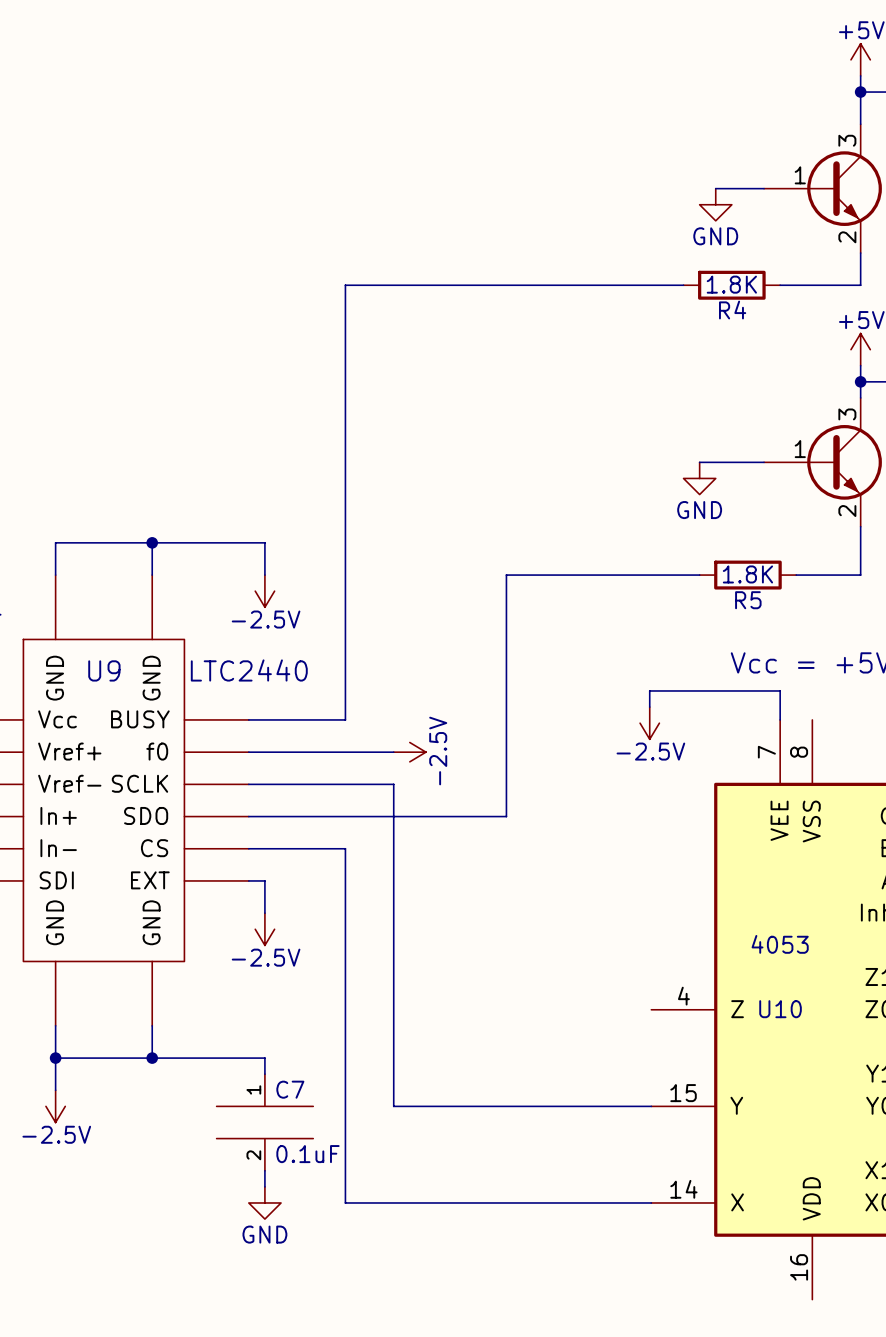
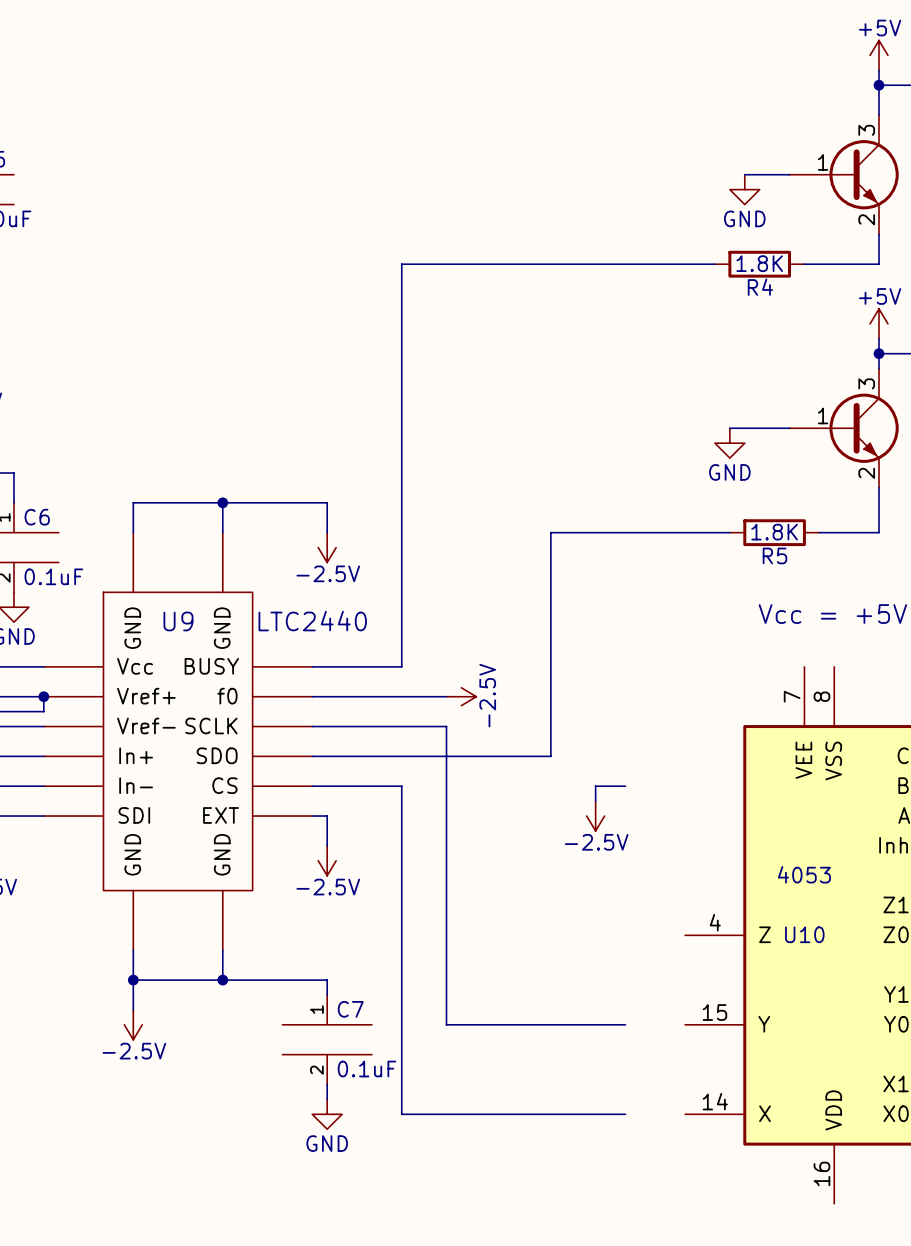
wire: (649, 707) (649, 690) (780, 690) (780, 719) -> none
power symbol position: -2.5V (649, 723) -> -2.5V (595, 816)
wire: none -> (625, 786) (595, 786) (595, 801)
wire: (586, 1106) (651, 1106) -> none
wire: (586, 1202) (651, 1202) -> none

